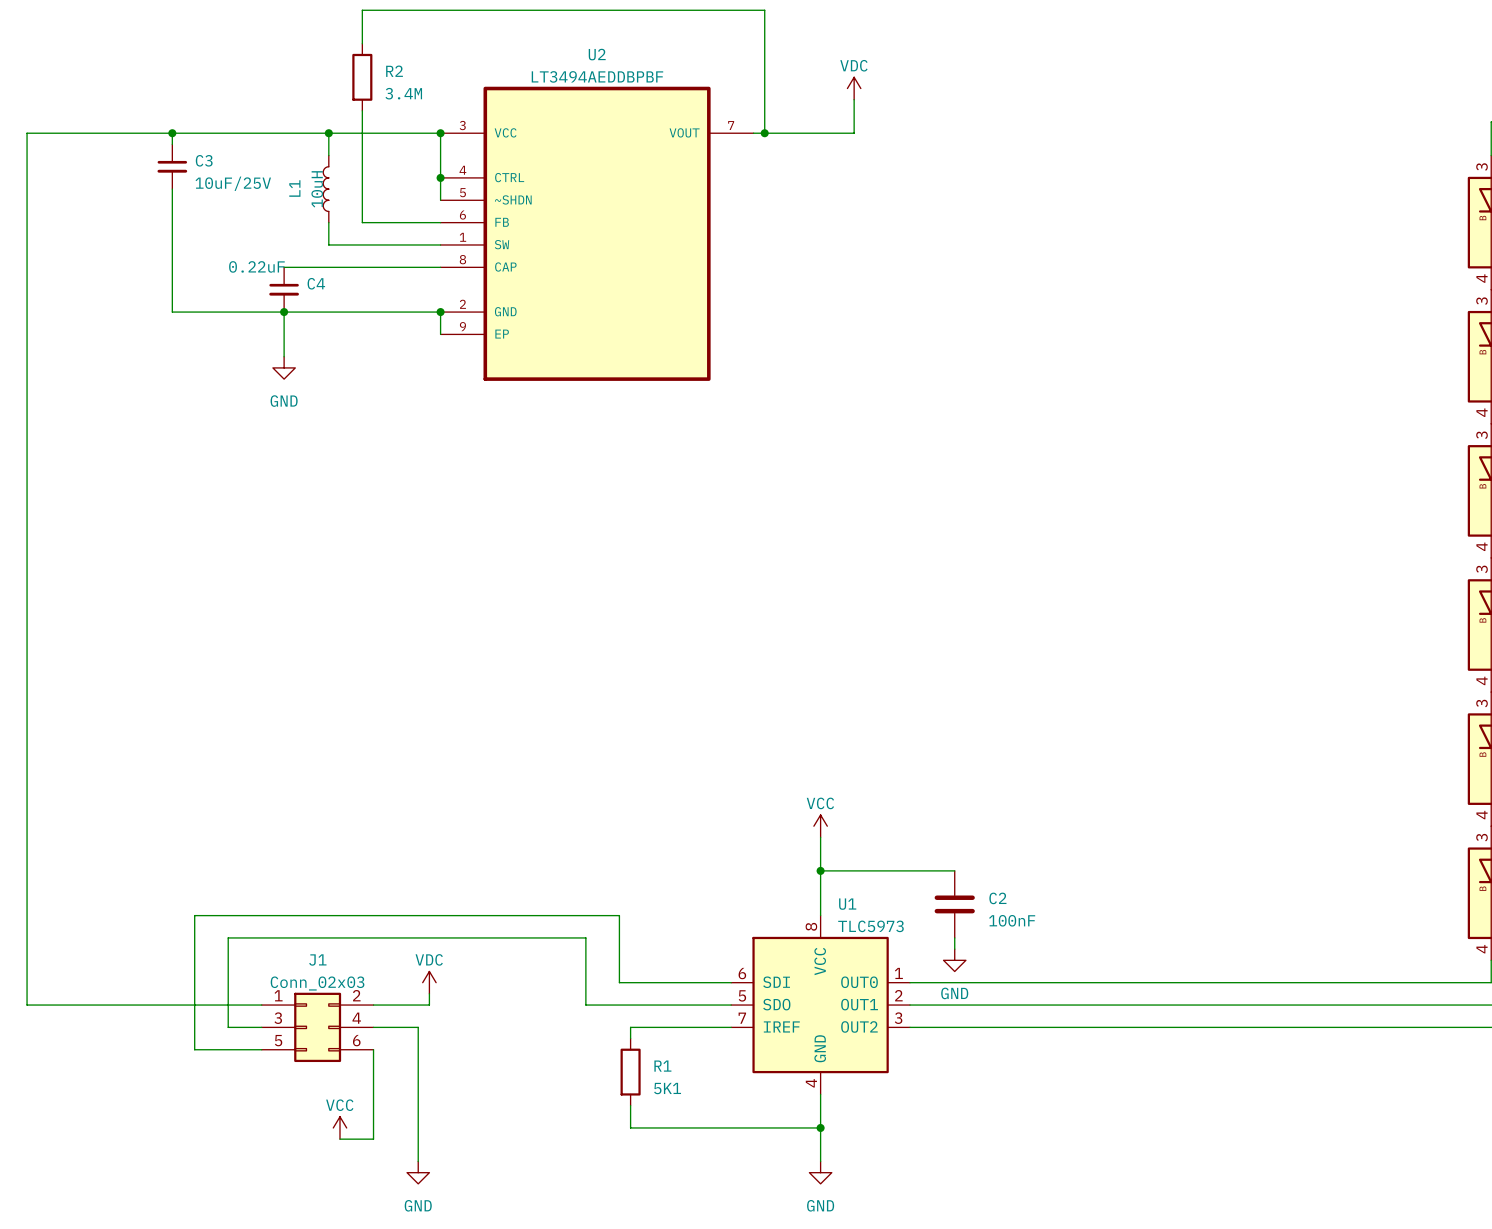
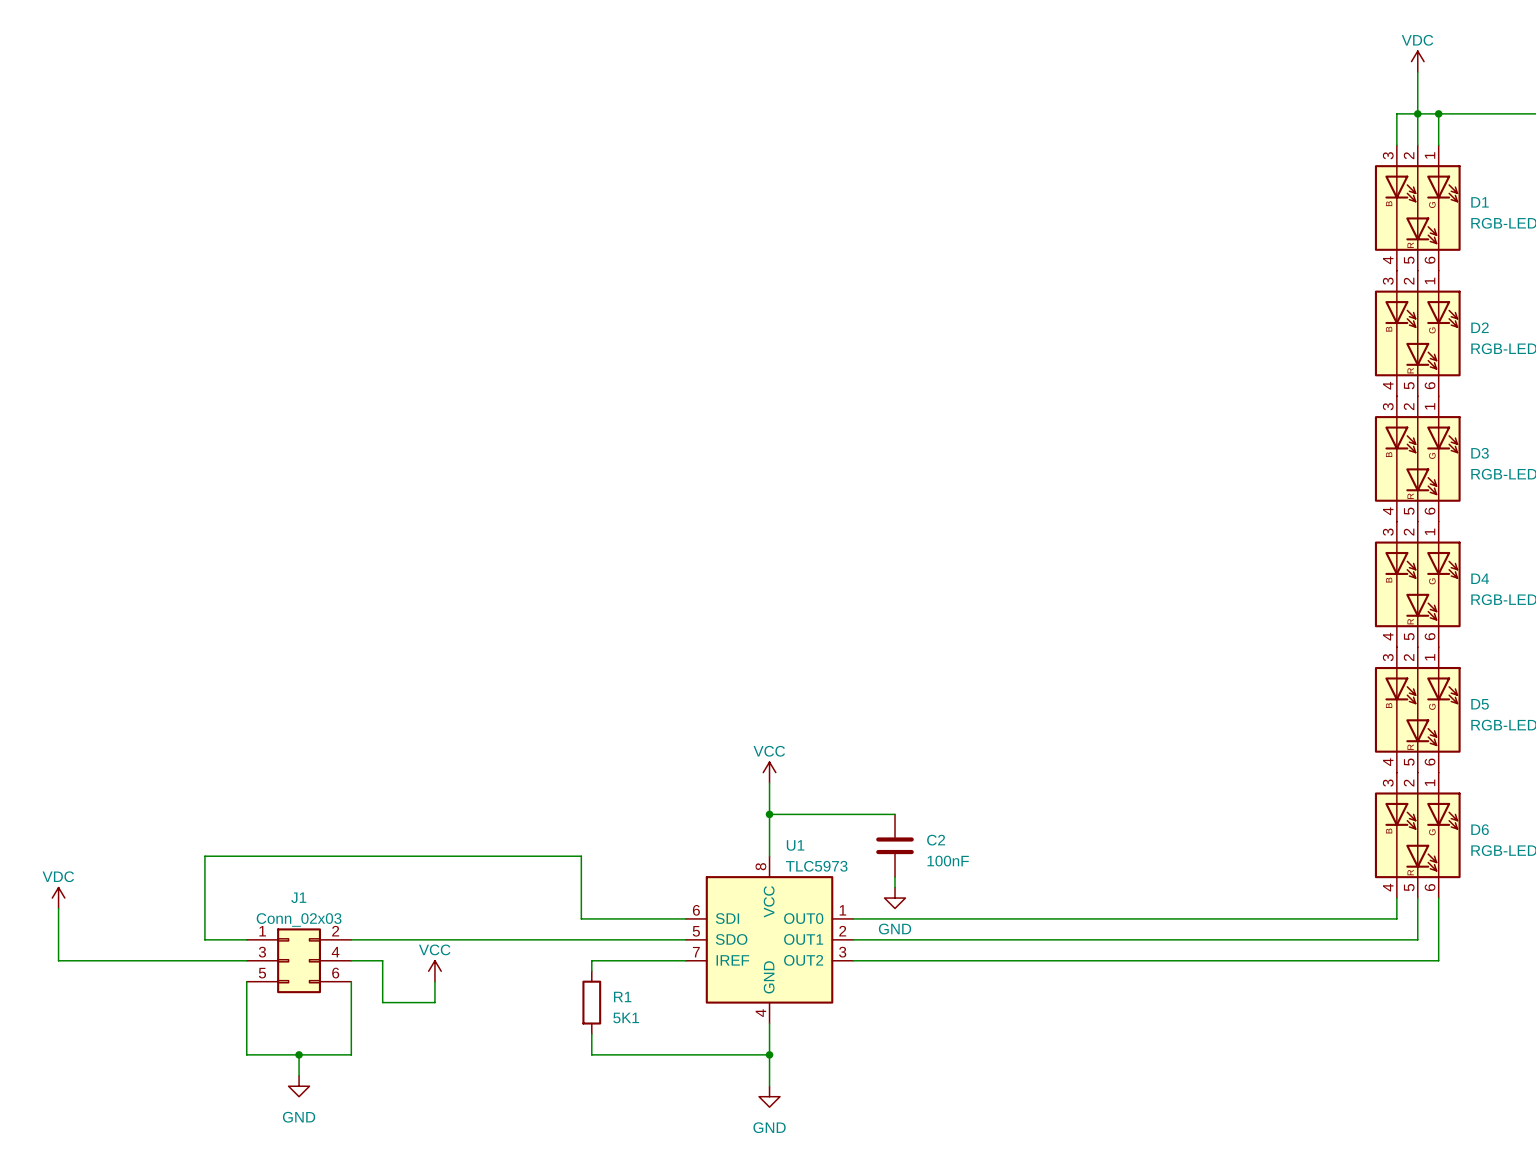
wire: (362, 43) (362, 10) (764, 10) (764, 133) -> none
R2: 3.4M (362, 77) -> none
power symbol: VDC (854, 88) -> none
wire: (854, 99) (854, 133) (753, 133) -> none
wire: (362, 110) (362, 222) (440, 222) -> none
wire: (172, 133) (172, 144) -> none
junction: (172, 133) -> none
wire: (328, 133) (328, 155) -> none
junction: (328, 133) -> none
junction: (440, 133) -> none
junction: (764, 133) -> none
C3: (172, 166) -> none
junction: (440, 177) -> none
wire: (172, 189) (172, 312) (440, 312) (440, 334) -> none
L1: 10uH (326, 189) -> none
wire: (440, 200) (440, 133) (27, 133) (27, 1005) (217, 1005) -> none
wire: (328, 222) (328, 244) (440, 244) -> none
U2: LT3494AEDDBPBF (597, 233) -> none
wire: (284, 267) (440, 267) -> none
C4: (284, 289) -> none
wire: (284, 312) (284, 356) -> none
junction: (284, 312) -> none
junction: (440, 312) -> none
power symbol: GND (284, 367) -> none
wire: (217, 915) (194, 915) (194, 1049) (261, 1049) -> (204, 856) (204, 939)
power symbol: none -> VDC (58, 898)
power symbol: VDC (429, 982) -> none
wire: (429, 993) (429, 1005) -> (549, 939) (403, 939)
wire: (585, 1005) (585, 937) (228, 937) (228, 1027) -> (58, 908) (58, 960) (215, 960)
wire: (407, 1027) (418, 1027) (418, 1161) -> (382, 960) (382, 1002) (434, 1002) (434, 981)
wire: none -> (299, 1054) (299, 1075)
junction: none -> (299, 1054)
power symbol position: VCC (339, 1127) -> VCC (434, 971)
wire: (373, 1127) (373, 1139) (339, 1139) -> (351, 1054) (246, 1054) (246, 981)
power symbol position: GND (418, 1172) -> GND (299, 1086)

